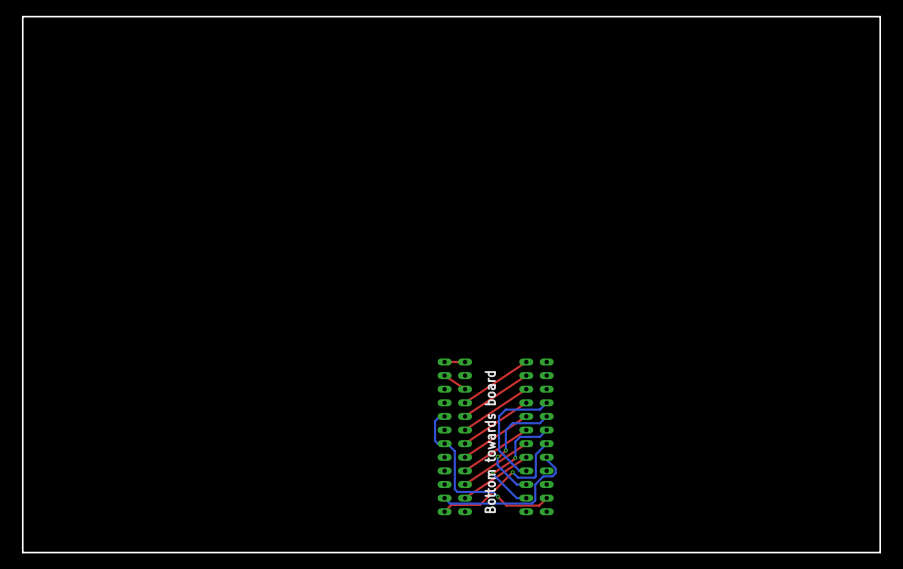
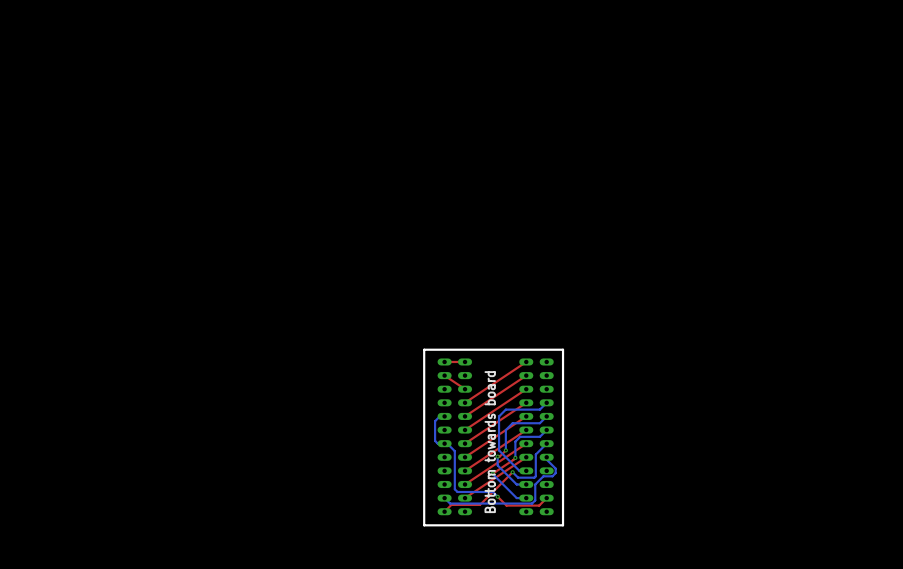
board edge: (880, 16) (22, 16) (22, 552) (880, 552) (880, 16) -> none
board edge: none -> (563, 349) (424, 349) (424, 525) (563, 525) (563, 349)

